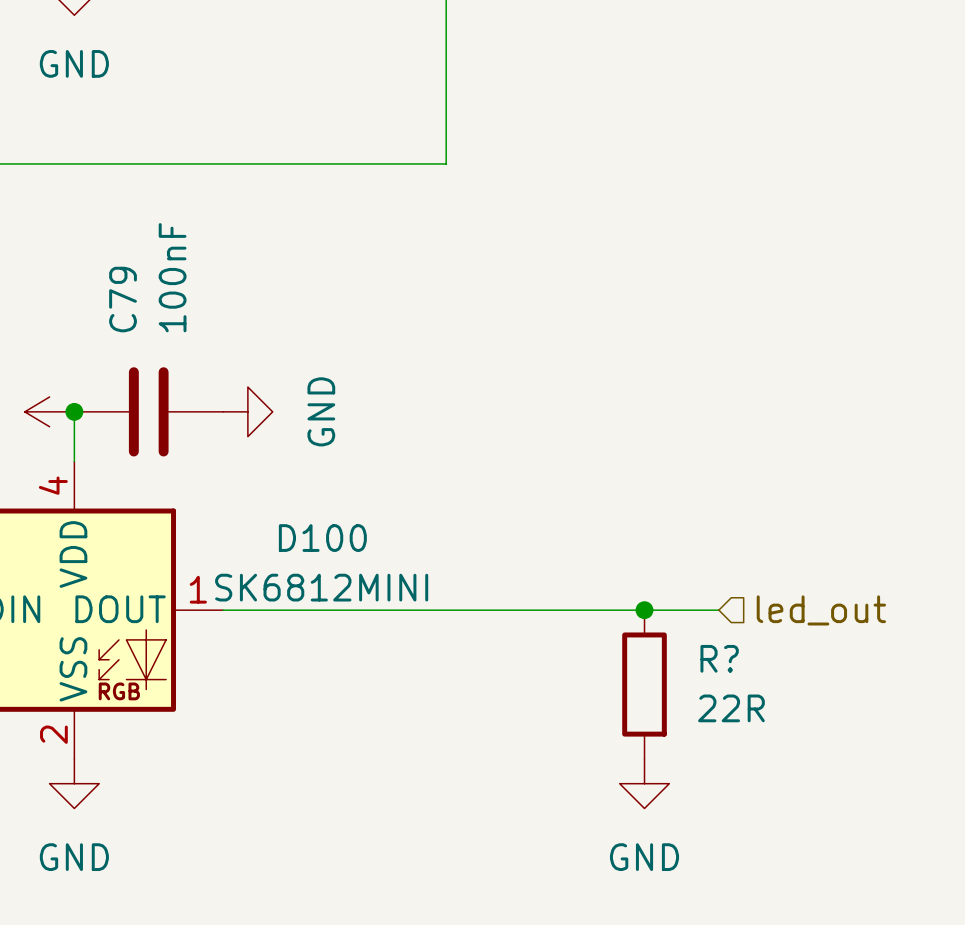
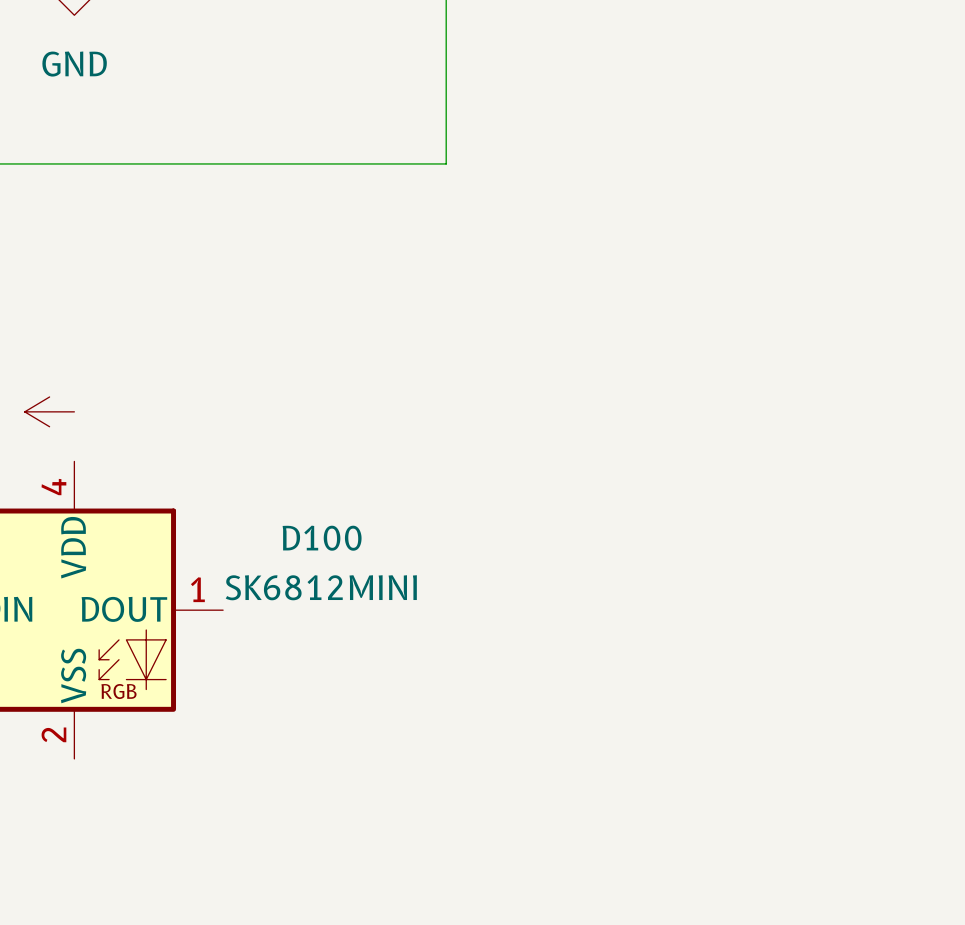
wire: (74, 411) (74, 461) -> none
junction: (74, 411) -> none
C79: 100nF (148, 411) -> none
power symbol: GND (247, 411) -> none
wire: (223, 610) (718, 610) -> none
junction: (644, 610) -> none
hierarchical label: led_out (821, 610) -> none
R?: 22R (644, 684) -> none
power symbol: GND (74, 783) -> none
power symbol: GND (644, 783) -> none

